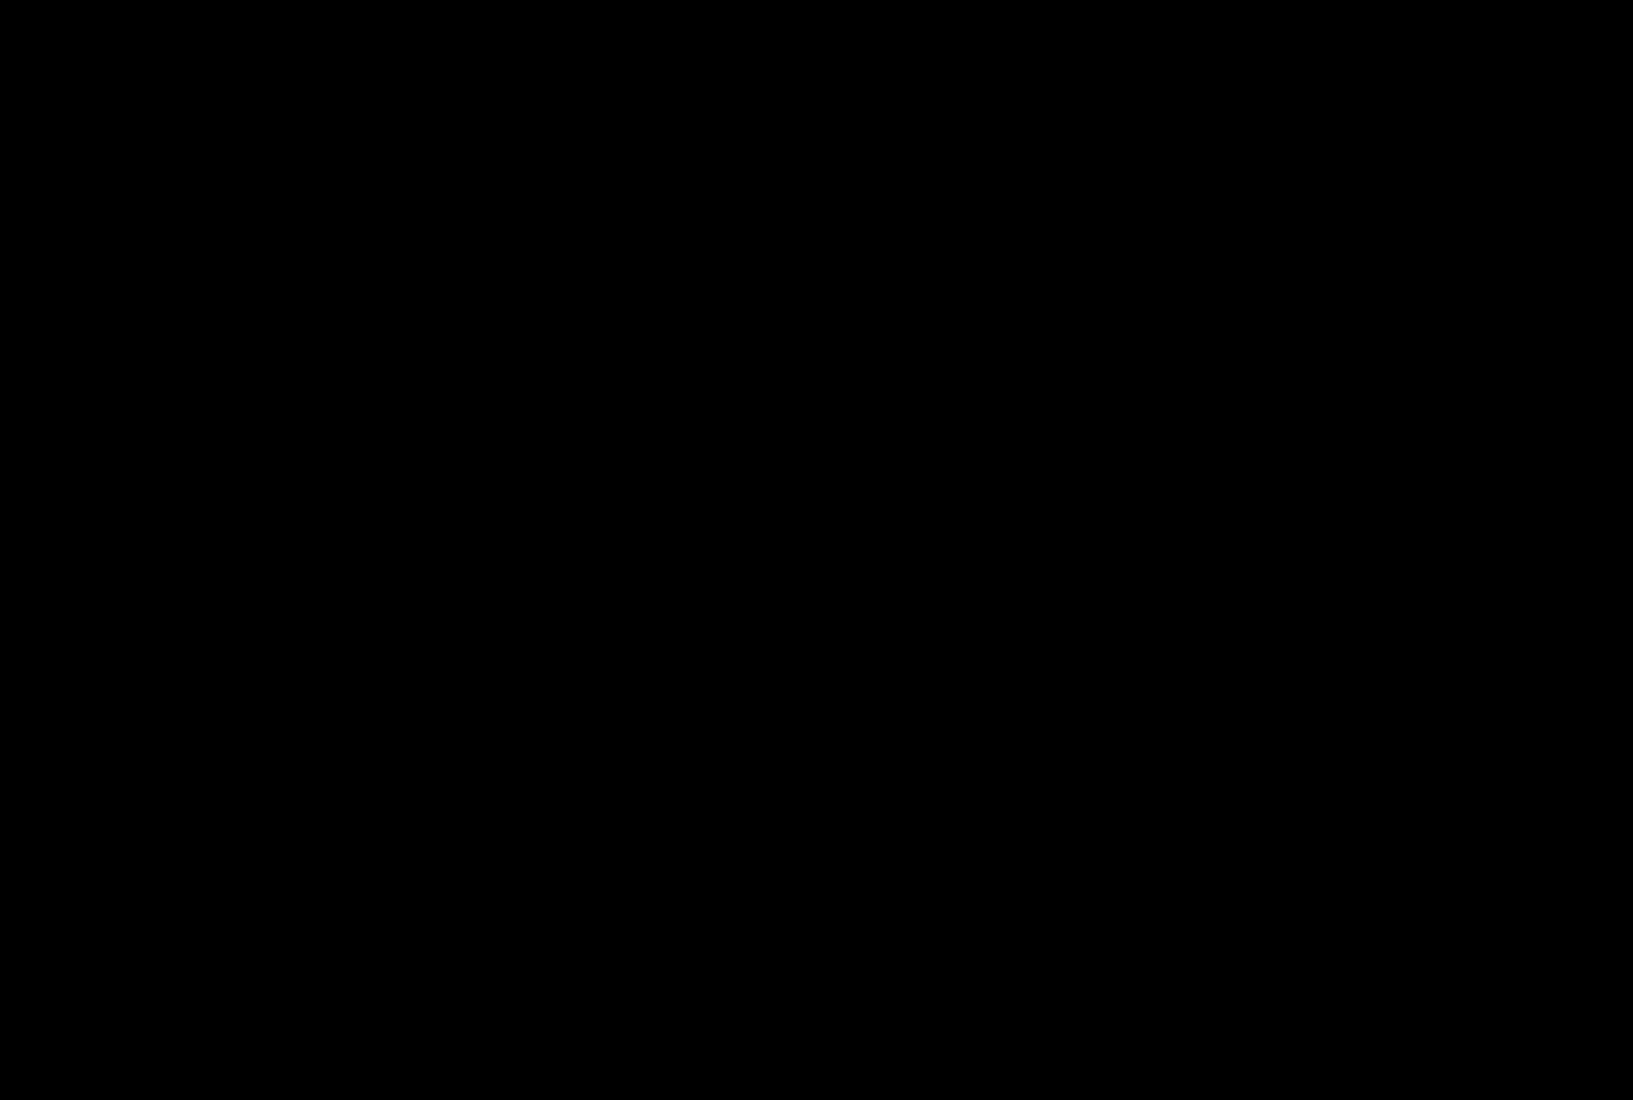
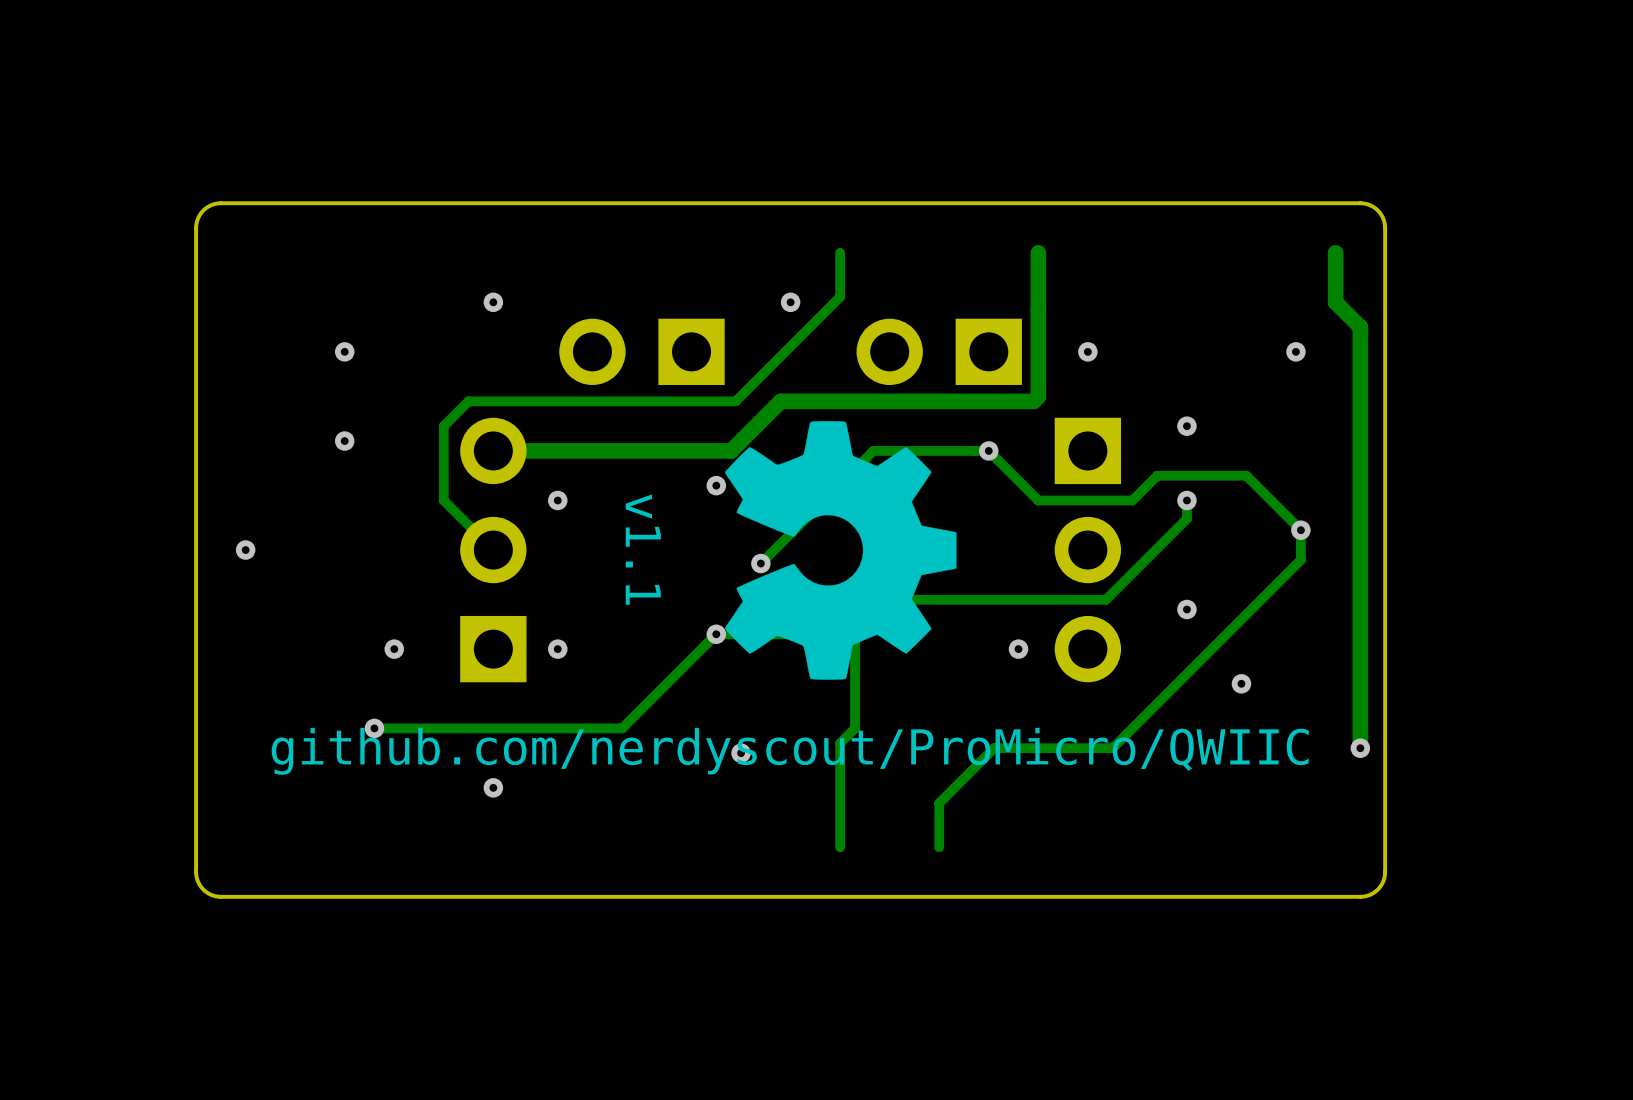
board edge: none -> (1360, 203) (220, 203) (208, 206) (199, 215) (196, 228) (196, 872) (199, 884) (208, 893) (220, 896) (1360, 896) (1372, 893) (1381, 884) (1385, 872) (1385, 228) (1383, 218) (1377, 210) (1369, 205) (1360, 203)
track: none -> (840, 252) (840, 296) (735, 401) (468, 401) (443, 426) (443, 500) (493, 550)
track: none -> (1038, 252) (1038, 396) (1033, 401) (780, 401) (731, 450) (493, 450)
track: none -> (1335, 252) (1335, 302) (1360, 327) (1360, 748)
via: none -> (493, 302)
via: none -> (790, 302)
via: none -> (344, 351)
part: none -> (641, 351)
part: none -> (939, 351)
via: none -> (1087, 351)
via: none -> (1295, 351)
drawing: none -> [724, 421, 957, 680]
via: none -> (1186, 426)
via: none -> (344, 441)
via: none -> (988, 450)
via: none -> (716, 485)
via: none -> (557, 500)
track: none -> (1186, 500) (1186, 518) (1106, 599) (889, 599) (855, 634)
via: none -> (1186, 500)
via: none -> (1300, 530)
text: none -> v1.1 (643, 549)
via: none -> (245, 550)
part: none -> (493, 550)
part: none -> (1087, 550)
track: none -> (760, 563) (873, 450) (988, 450) (1038, 500) (1132, 500) (1157, 475) (1246, 475) (1300, 530) (1300, 559) (1112, 748) (994, 748) (939, 803) (939, 847)
via: none -> (760, 563)
via: none -> (1186, 609)
via: none -> (716, 634)
track: none -> (855, 634) (716, 634) (622, 728) (374, 728)
track: none -> (855, 634) (855, 728) (840, 743) (840, 847)
via: none -> (394, 649)
via: none -> (557, 649)
via: none -> (1018, 649)
via: none -> (1241, 683)
via: none -> (374, 728)
via: none -> (1360, 748)
text: none -> github.com/nerdyscout/ProMicro/QWIIC (790, 751)
via: none -> (741, 753)
via: none -> (493, 787)

